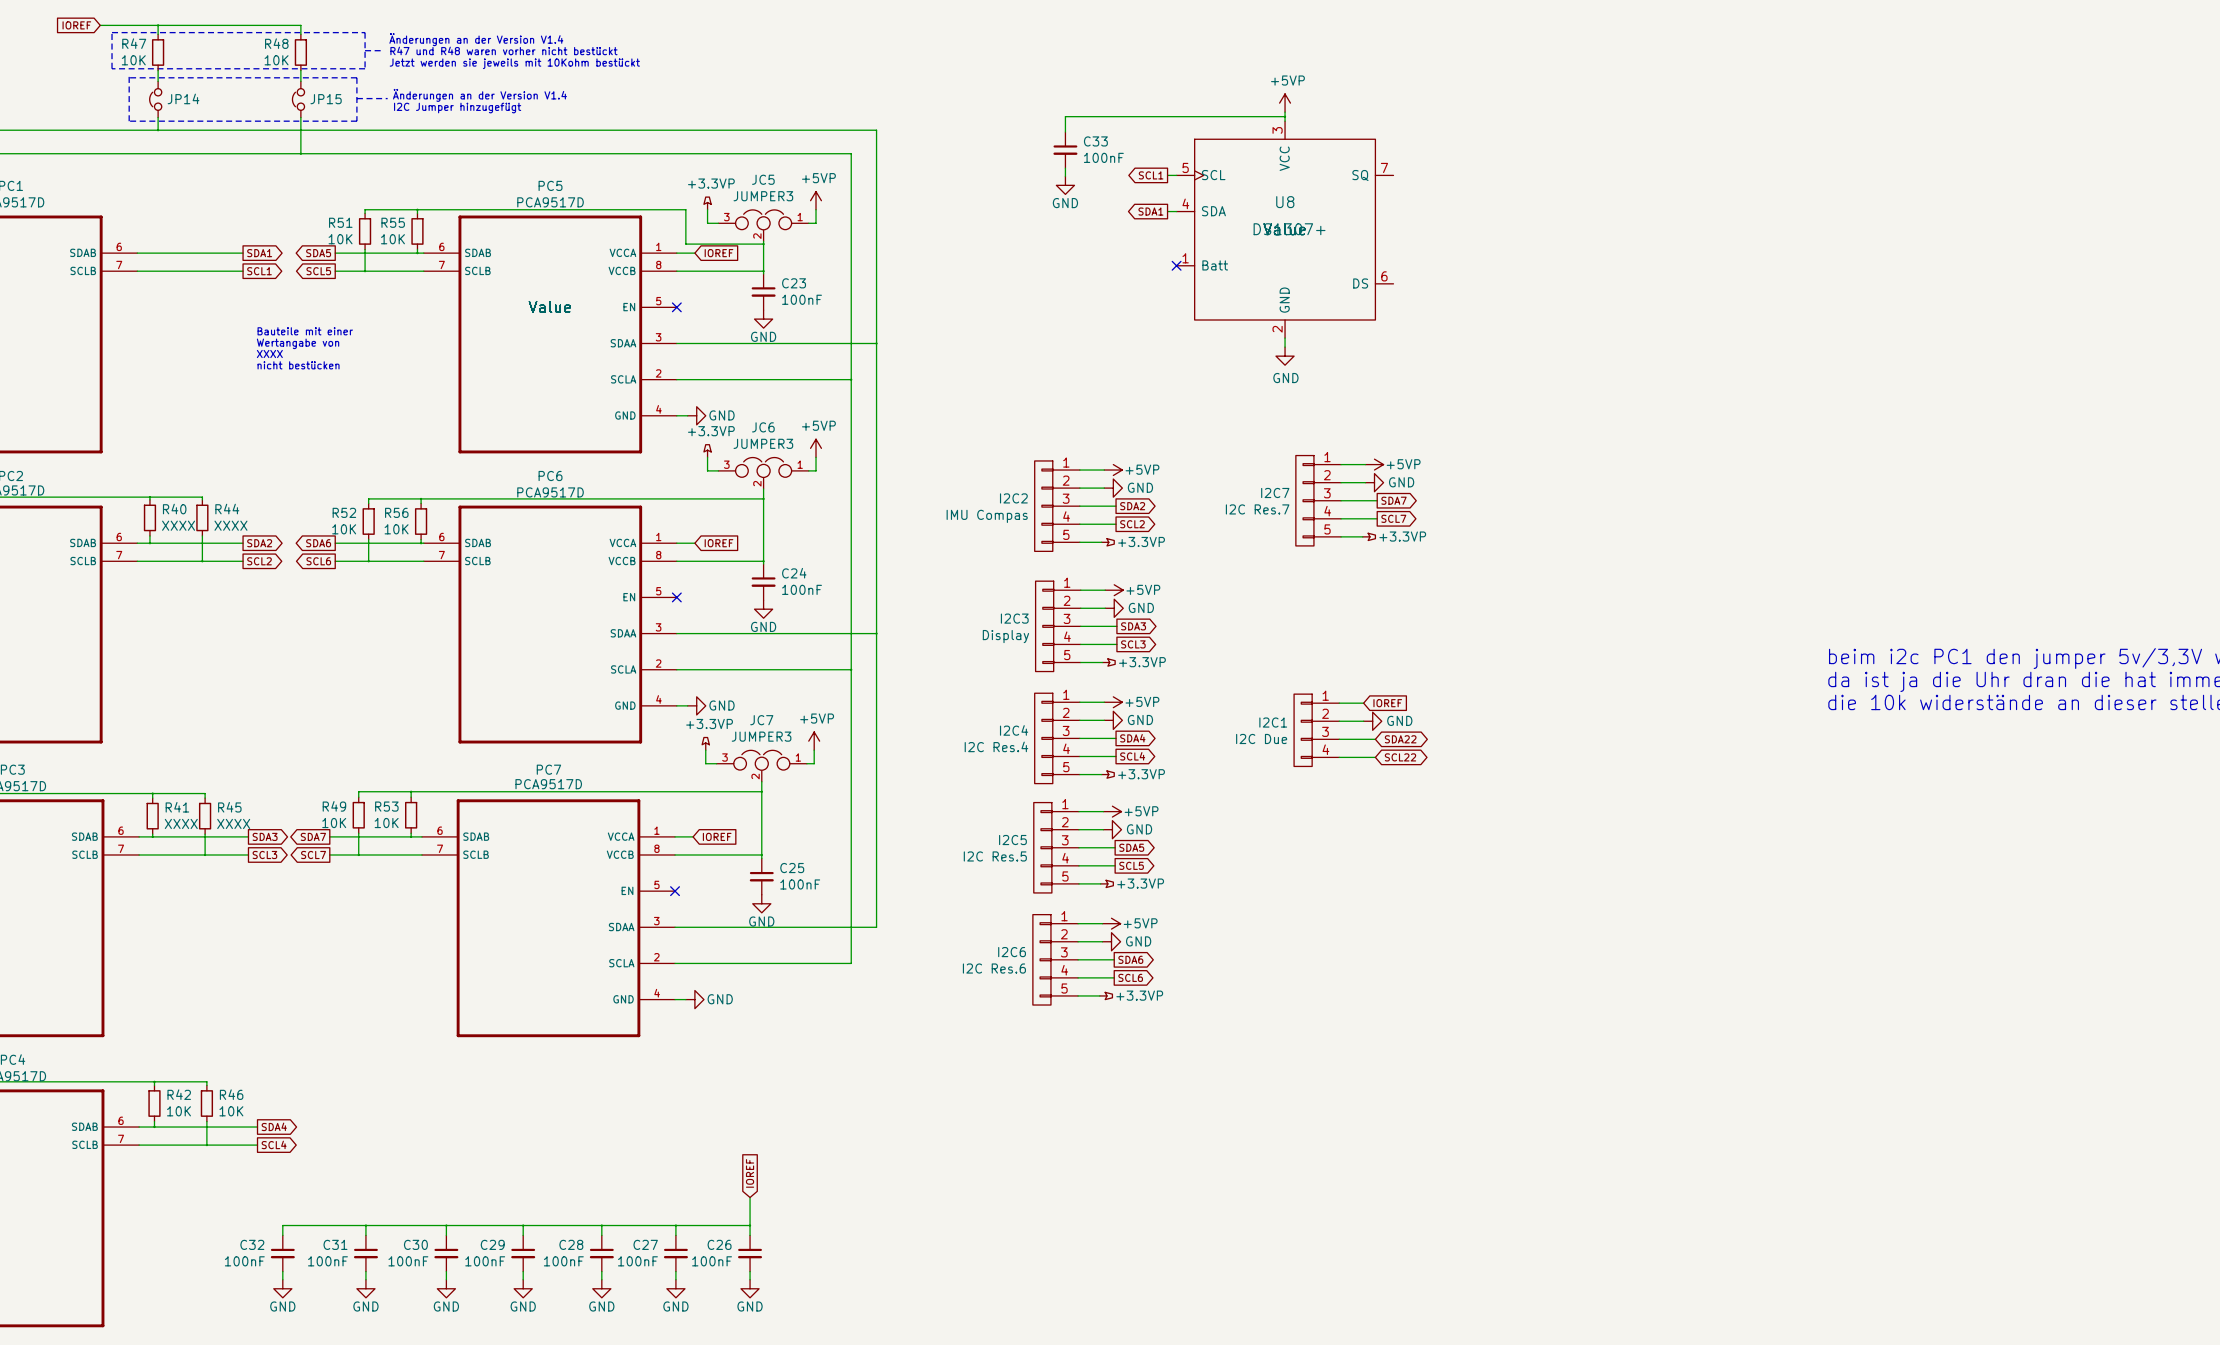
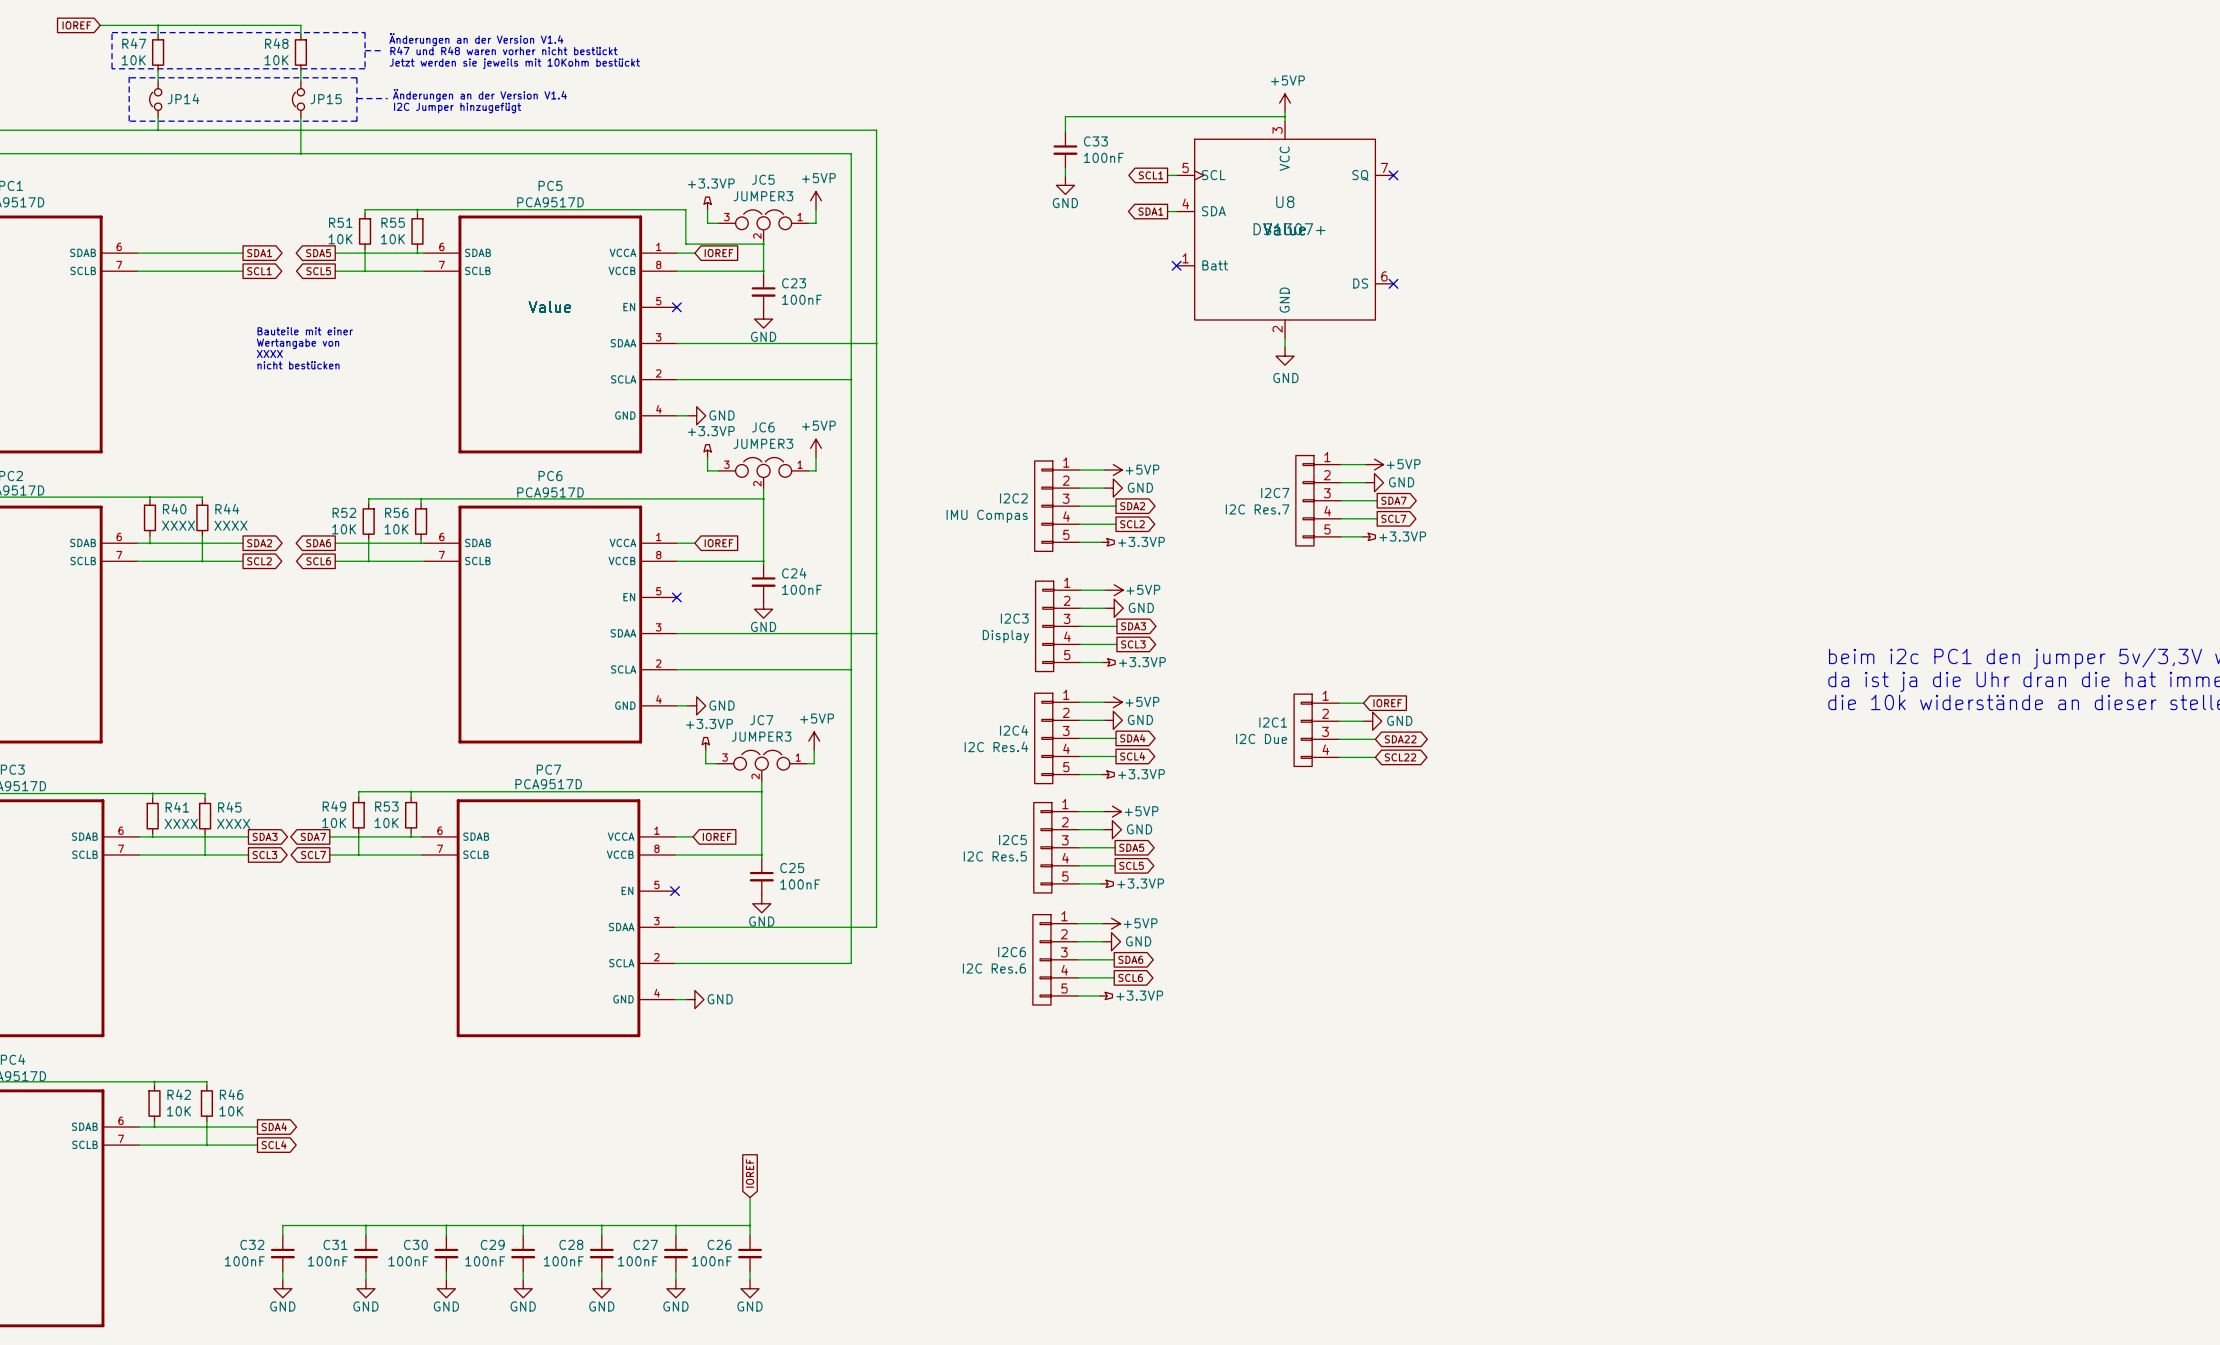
no-connect mark: none -> (1393, 175)
no-connect mark: none -> (1393, 283)

